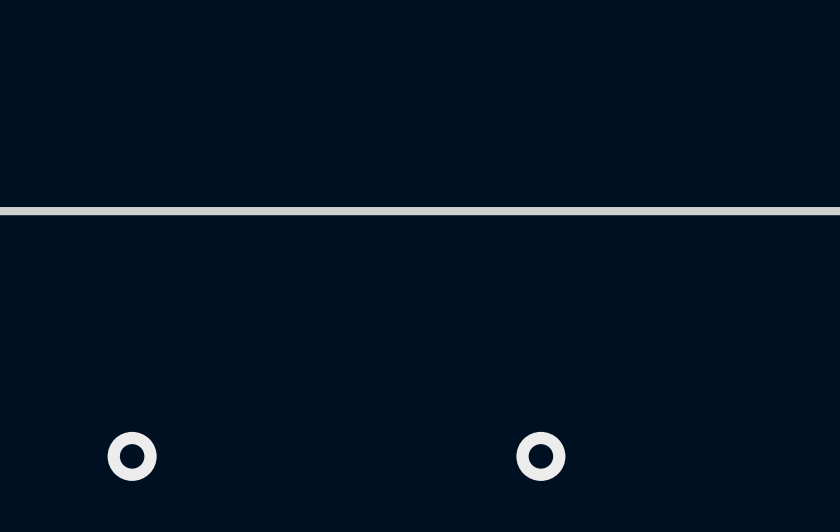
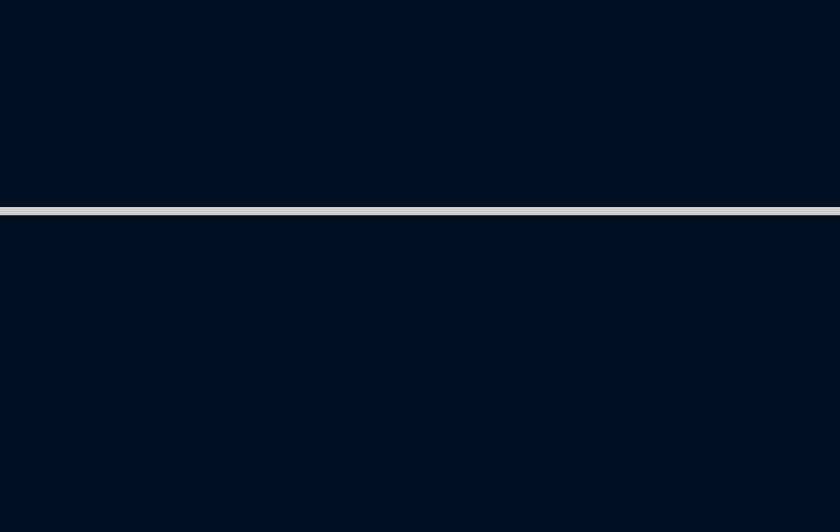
via: (132, 456) -> none
via: (540, 456) -> none

